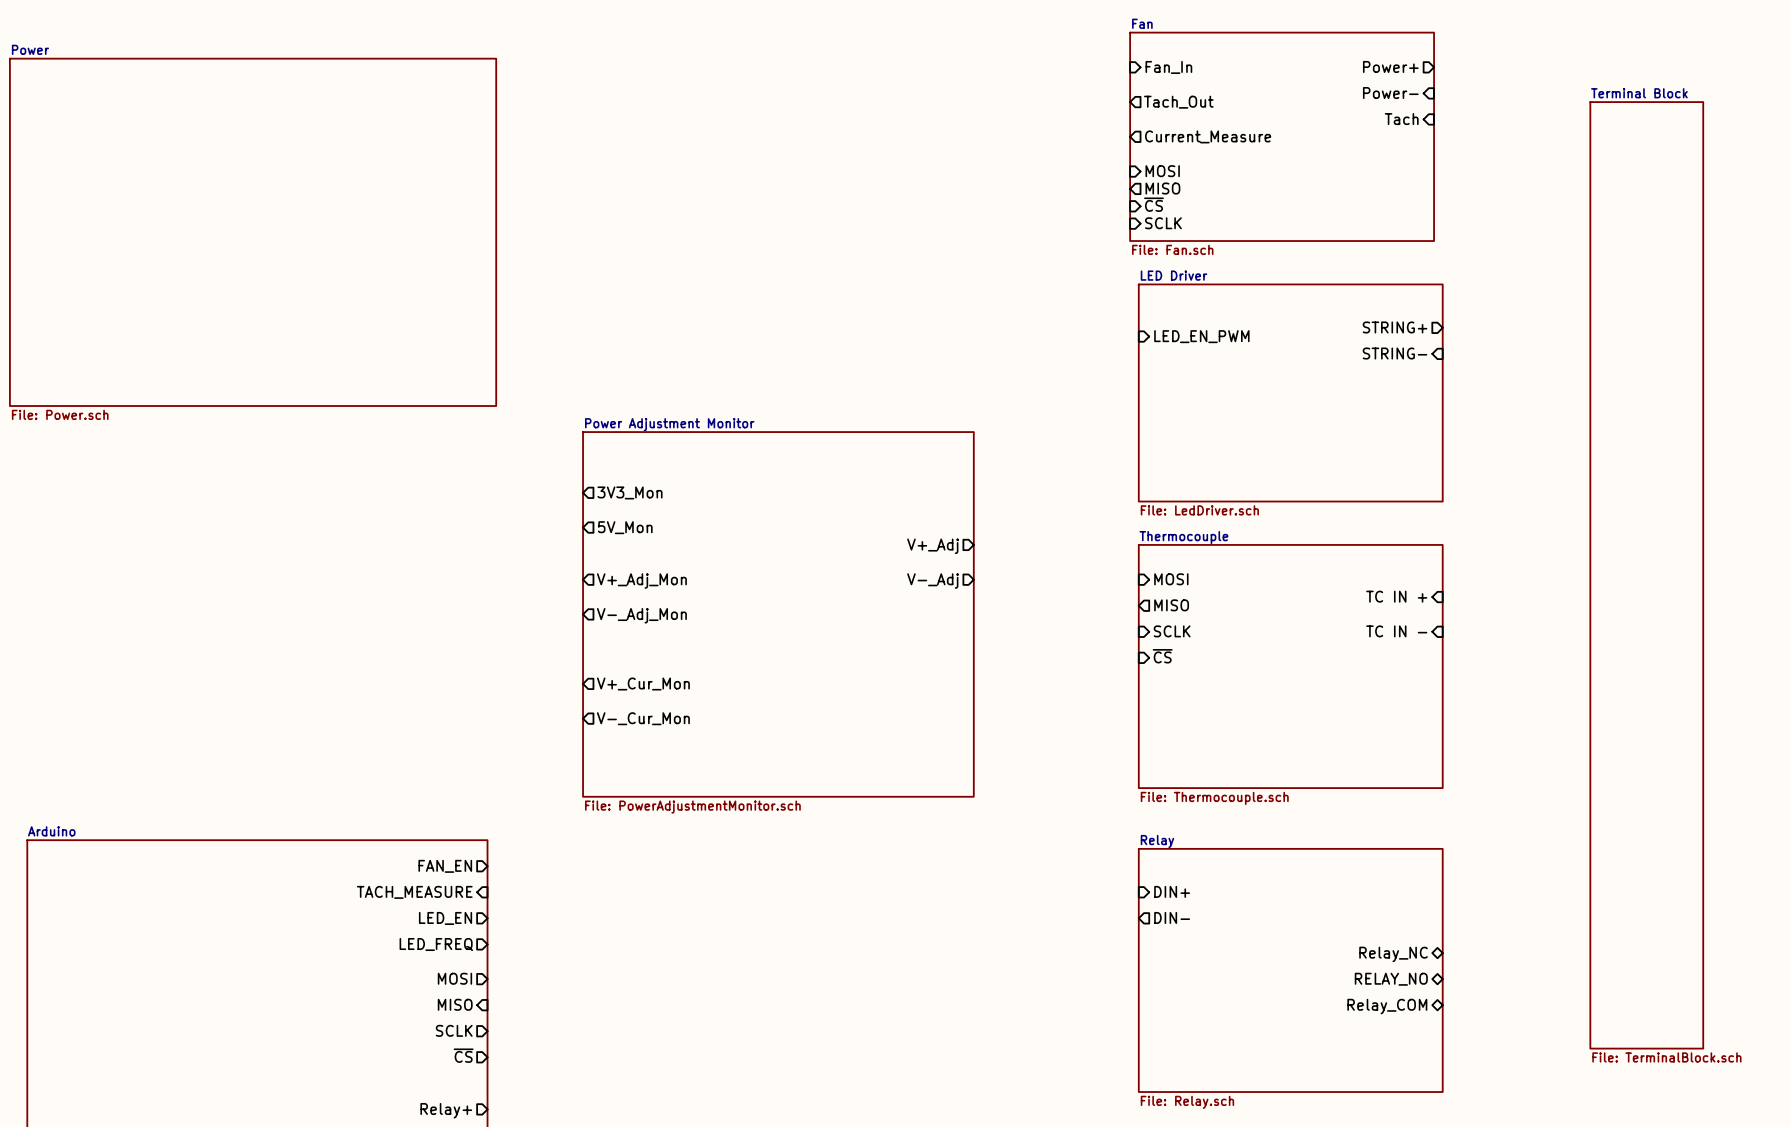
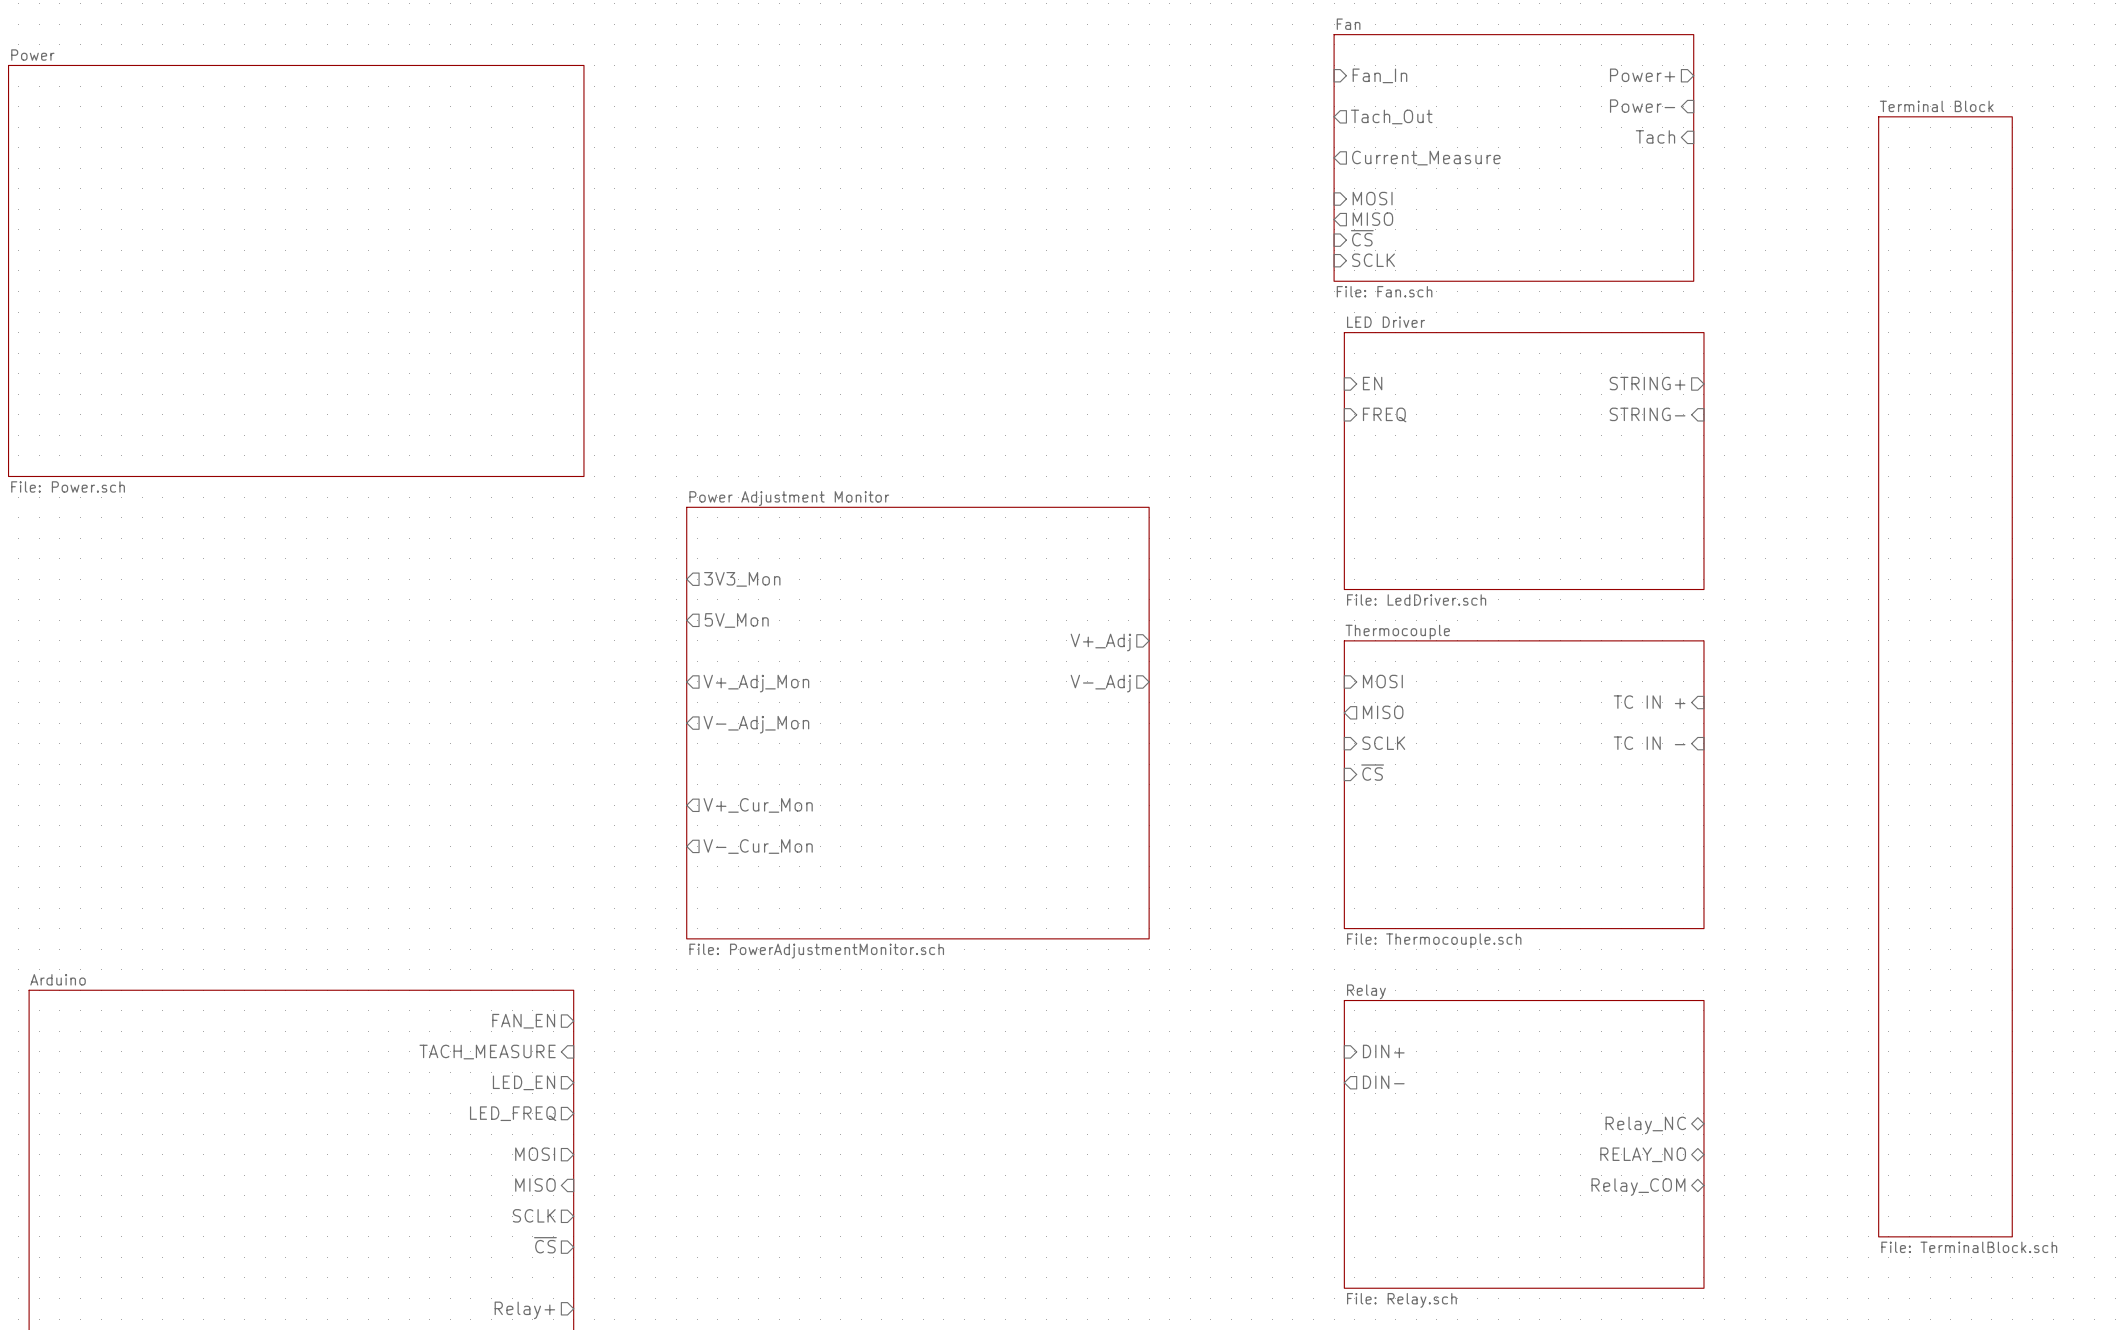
sheet pin: none -> EN (1372, 383)
sheet pin: LED_EN_PWM (1201, 336) -> none
sheet pin: none -> FREQ (1384, 414)

